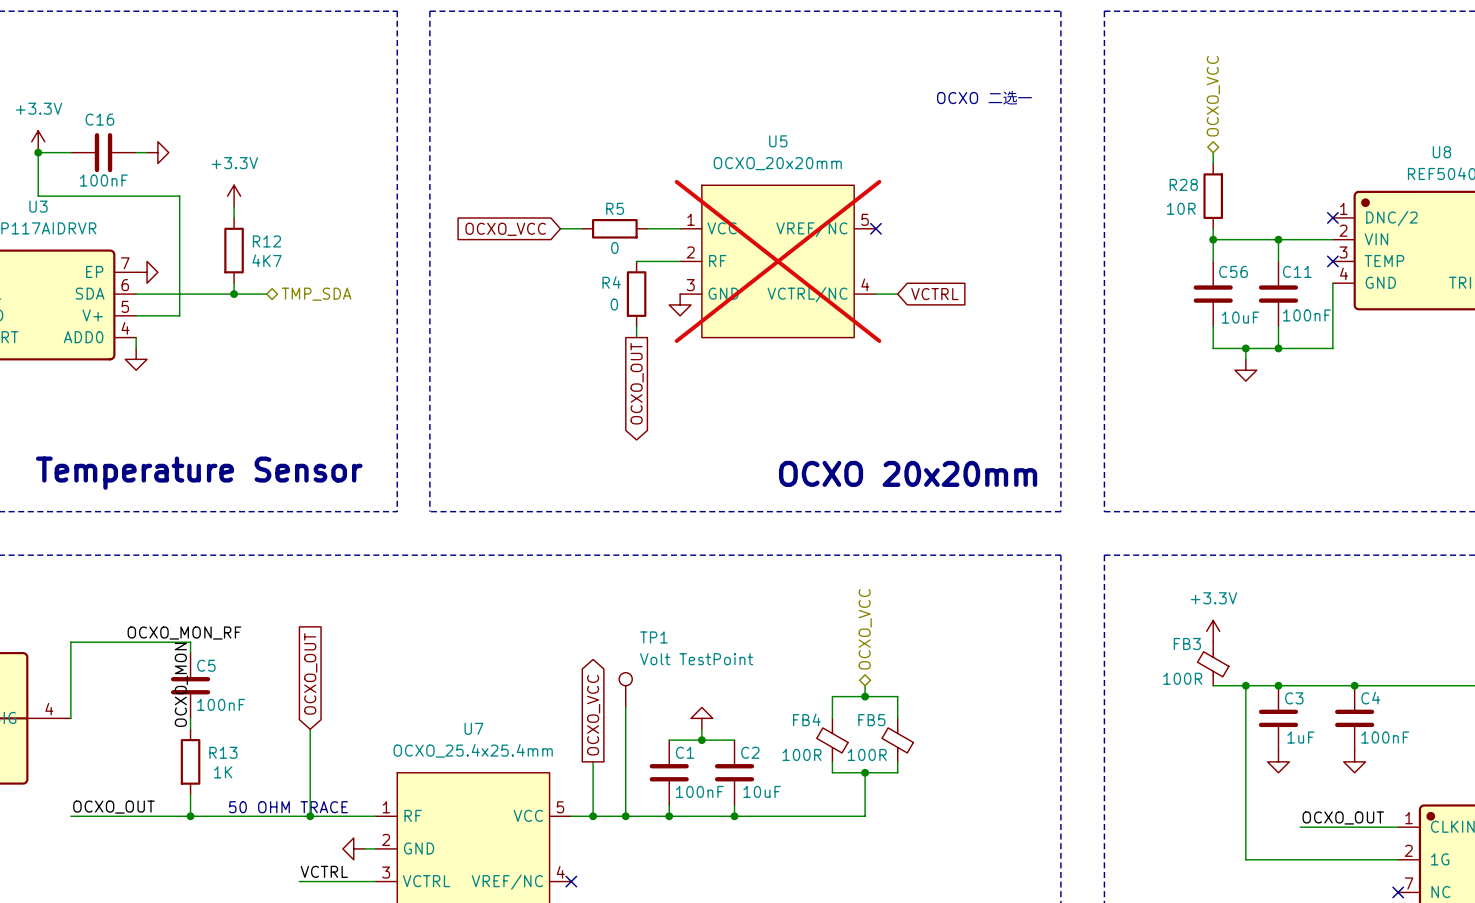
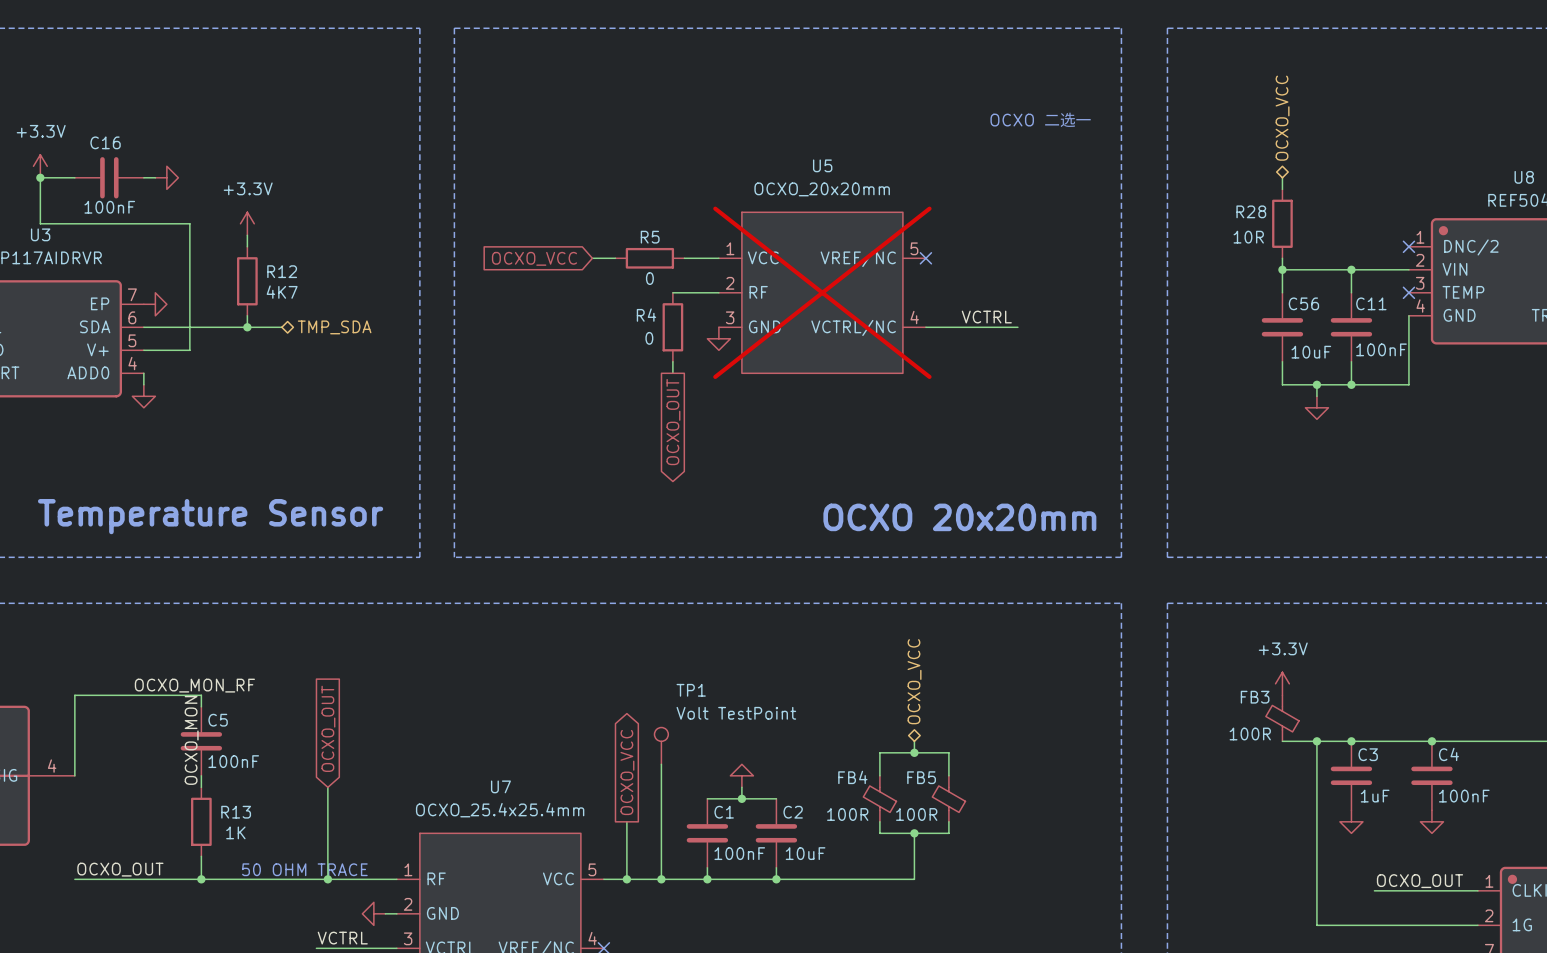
label: none -> VCTRL (986, 317)
wire: none -> (948, 327) (1017, 327)
global label: VCTRL (934, 294) -> none

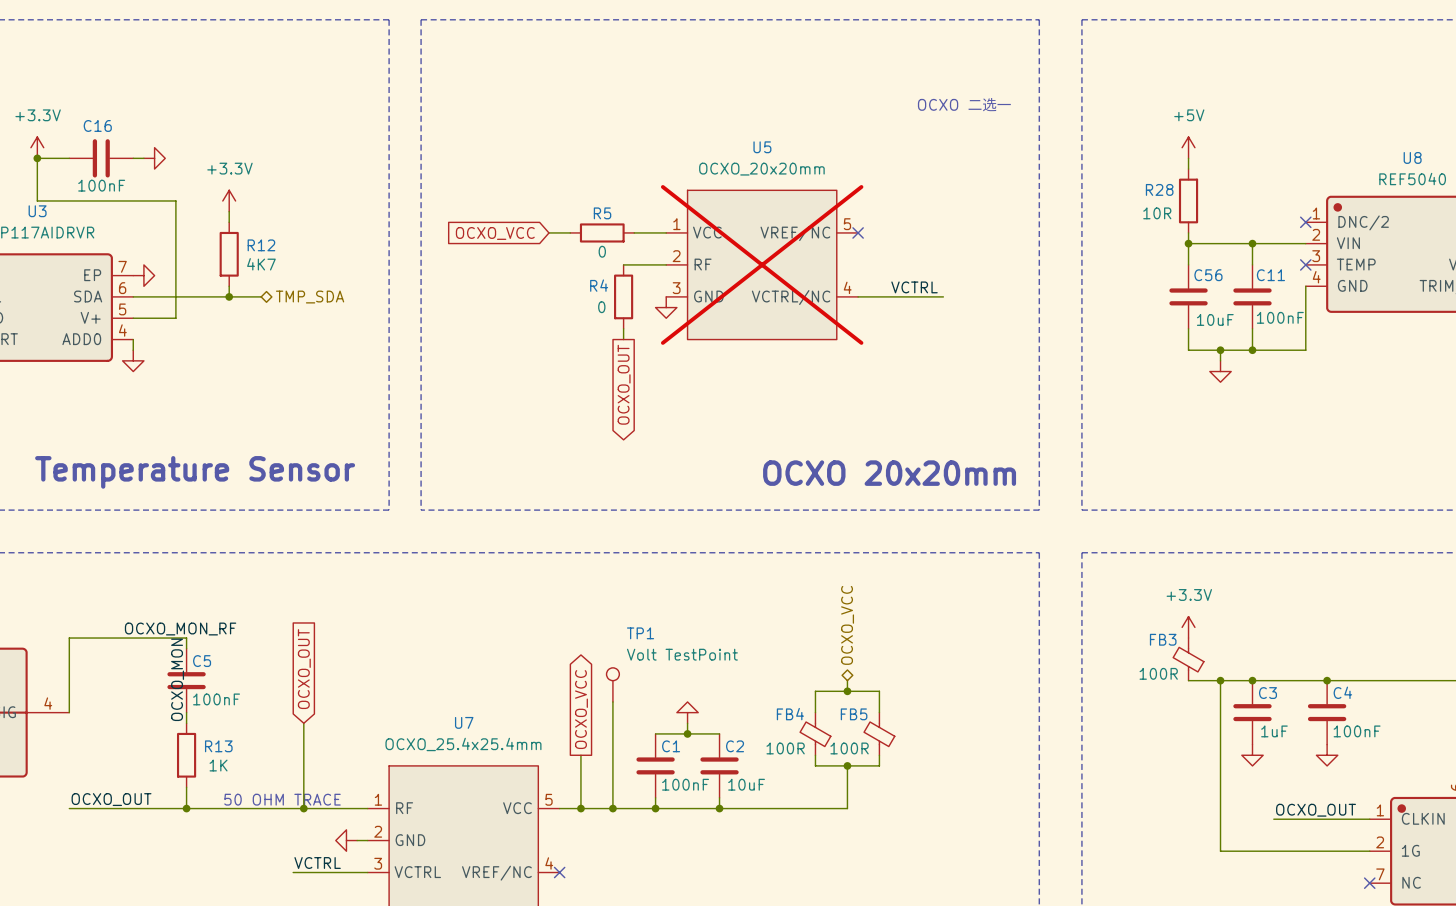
hierarchical label: OCXO_VCC (1282, 118) -> none
power symbol: none -> +5V (1188, 147)

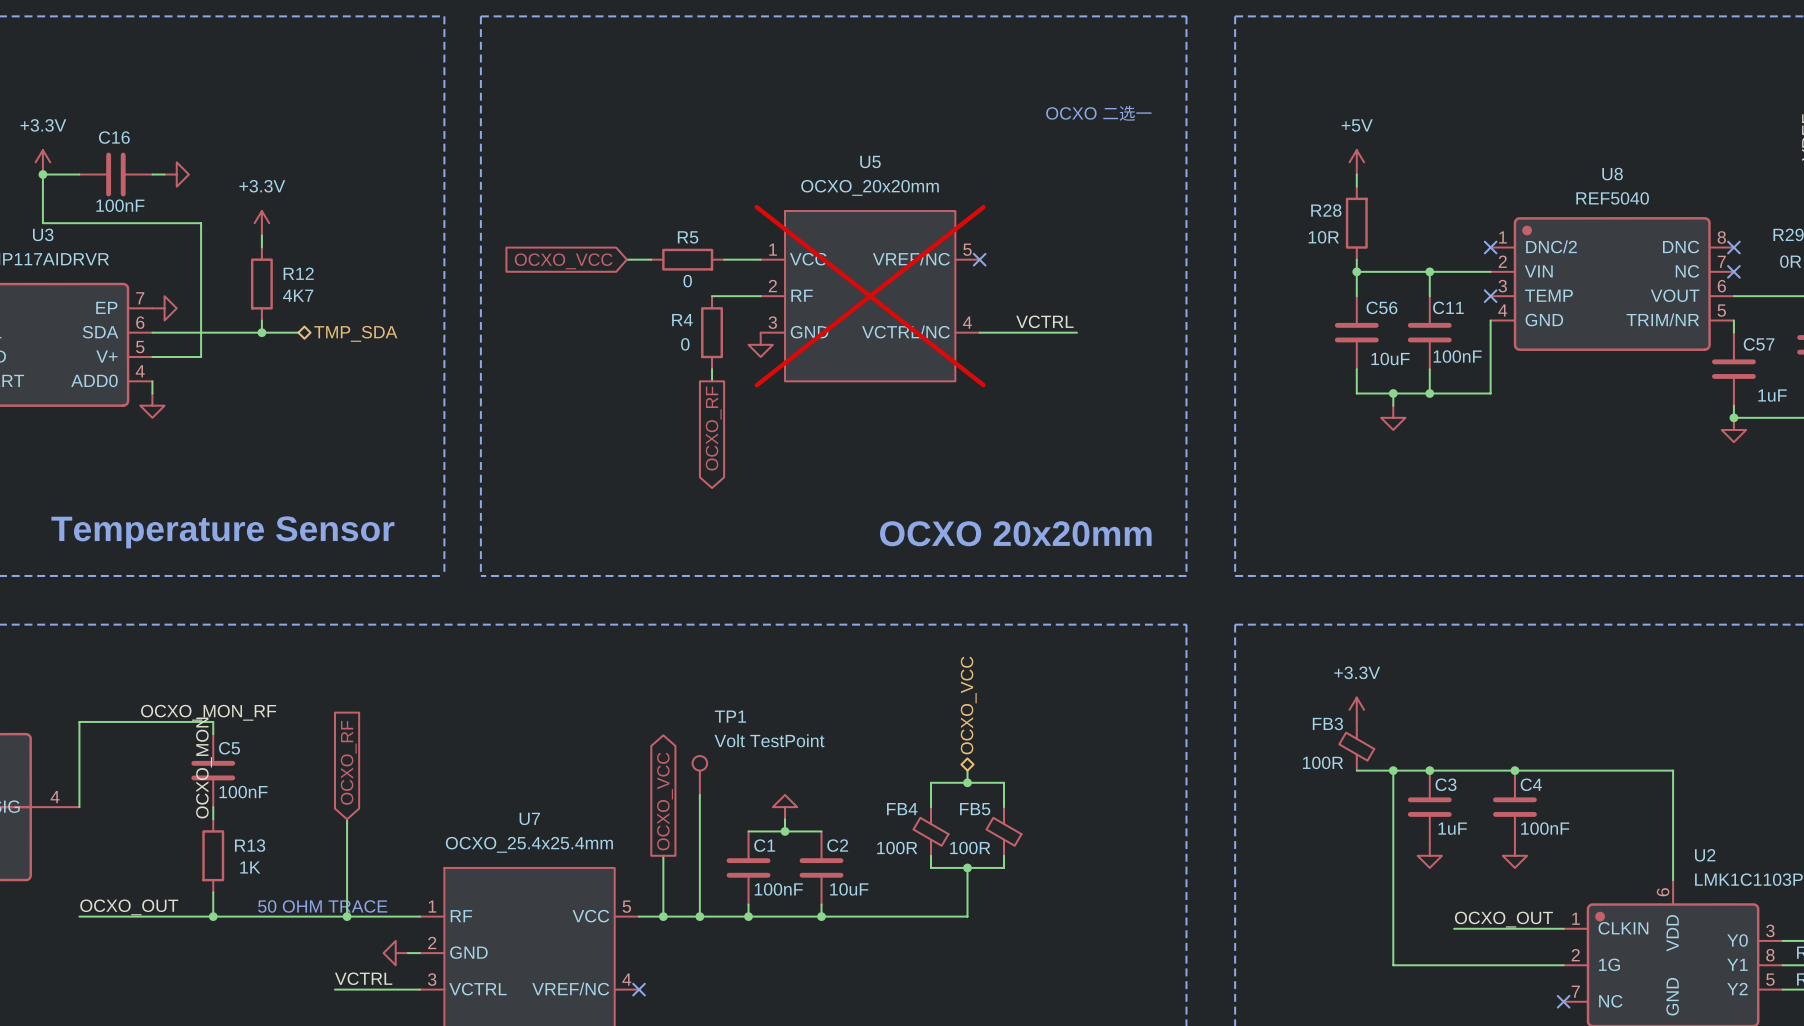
global label: OCXO_OUT (624, 384) -> OCXO_RF (713, 428)
global label: OCXO_OUT (304, 669) -> OCXO_RF (348, 762)

